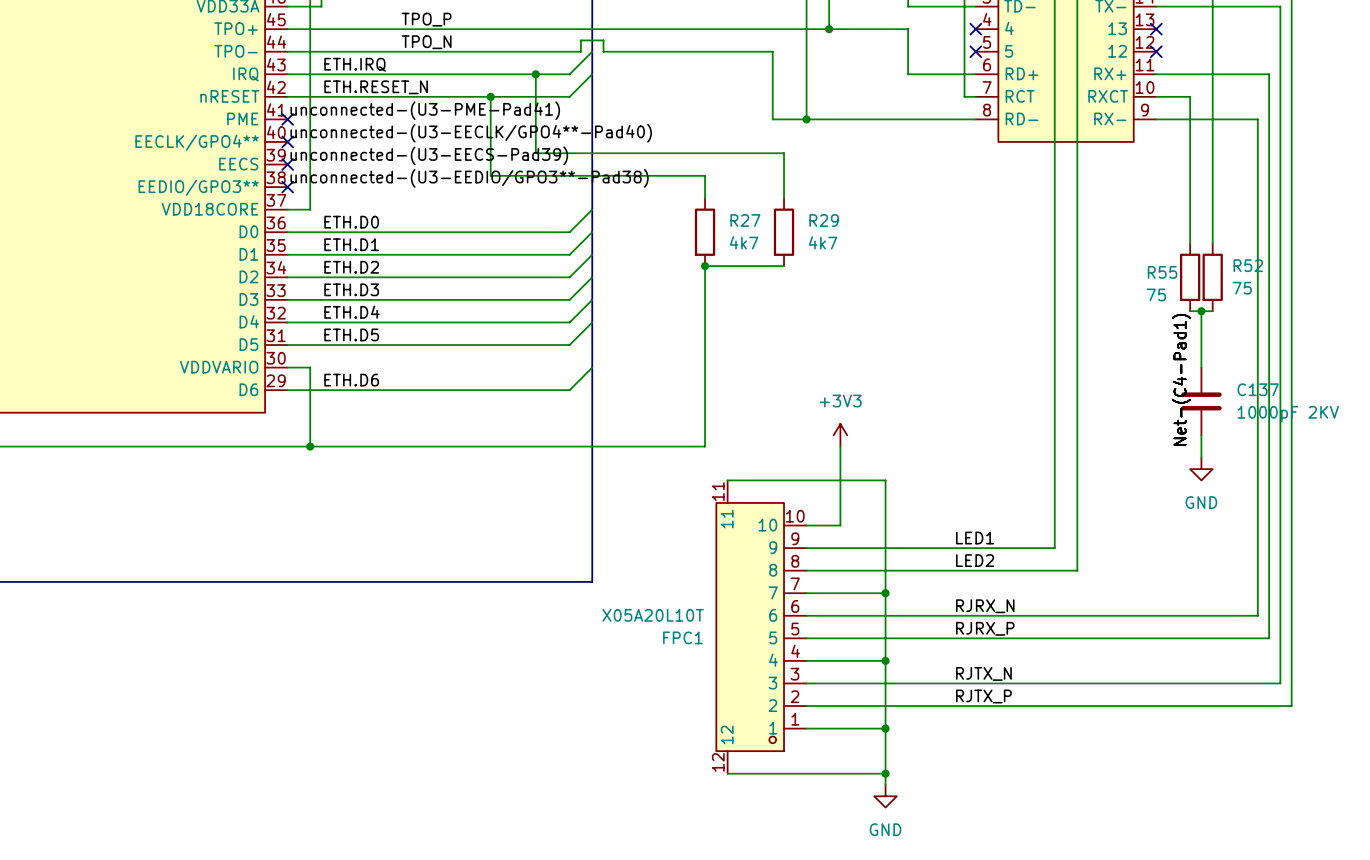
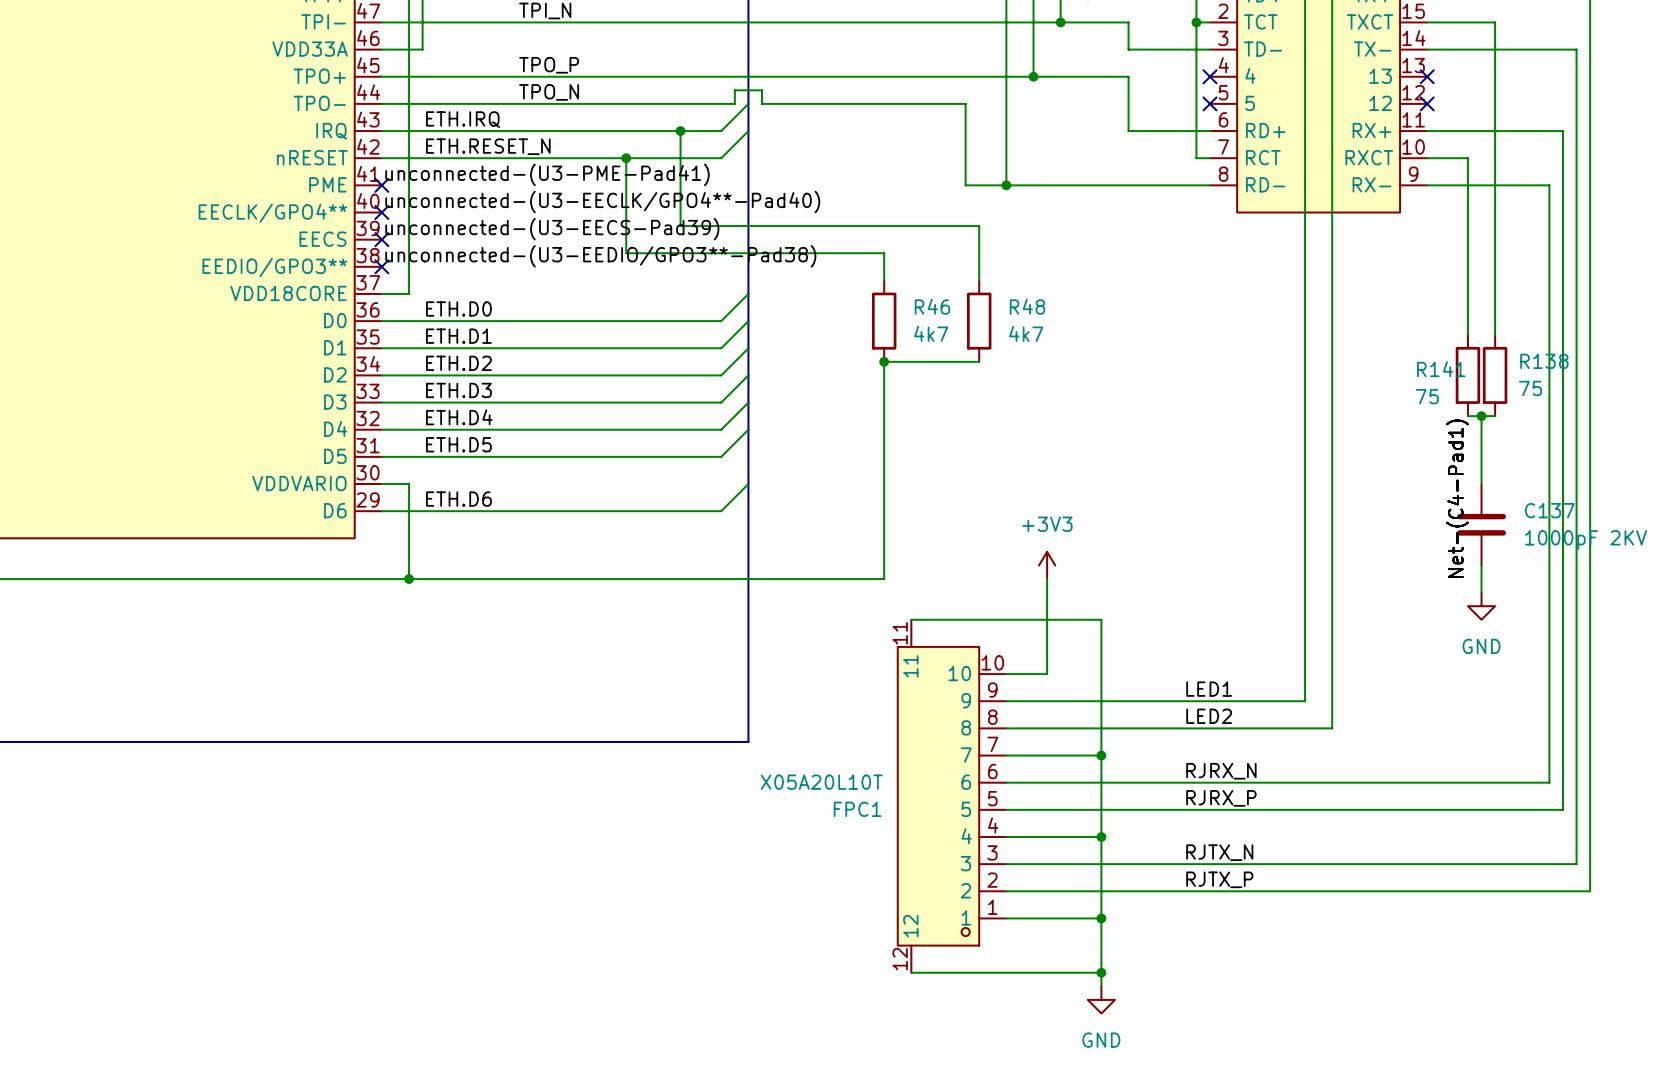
R27 name: R27 (745, 220) -> R46 (932, 306)
R29 name: R29 (824, 220) -> R48 (1027, 306)
R52 name: R52 (1248, 265) -> R138 (1544, 361)
R55 name: R55 (1162, 272) -> R141 (1441, 369)

